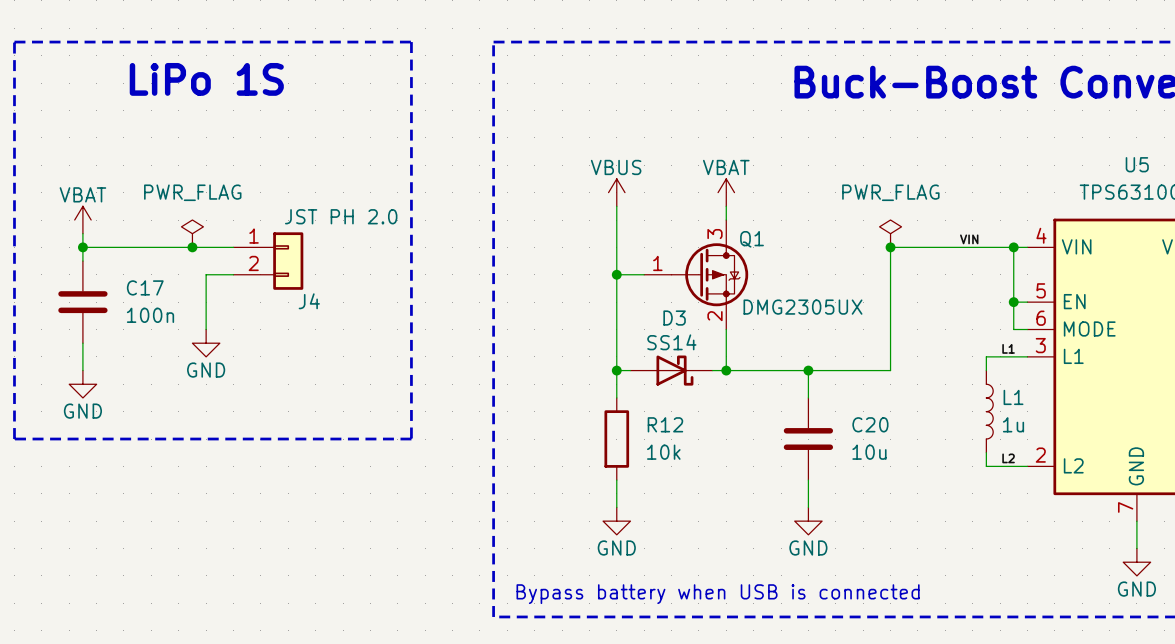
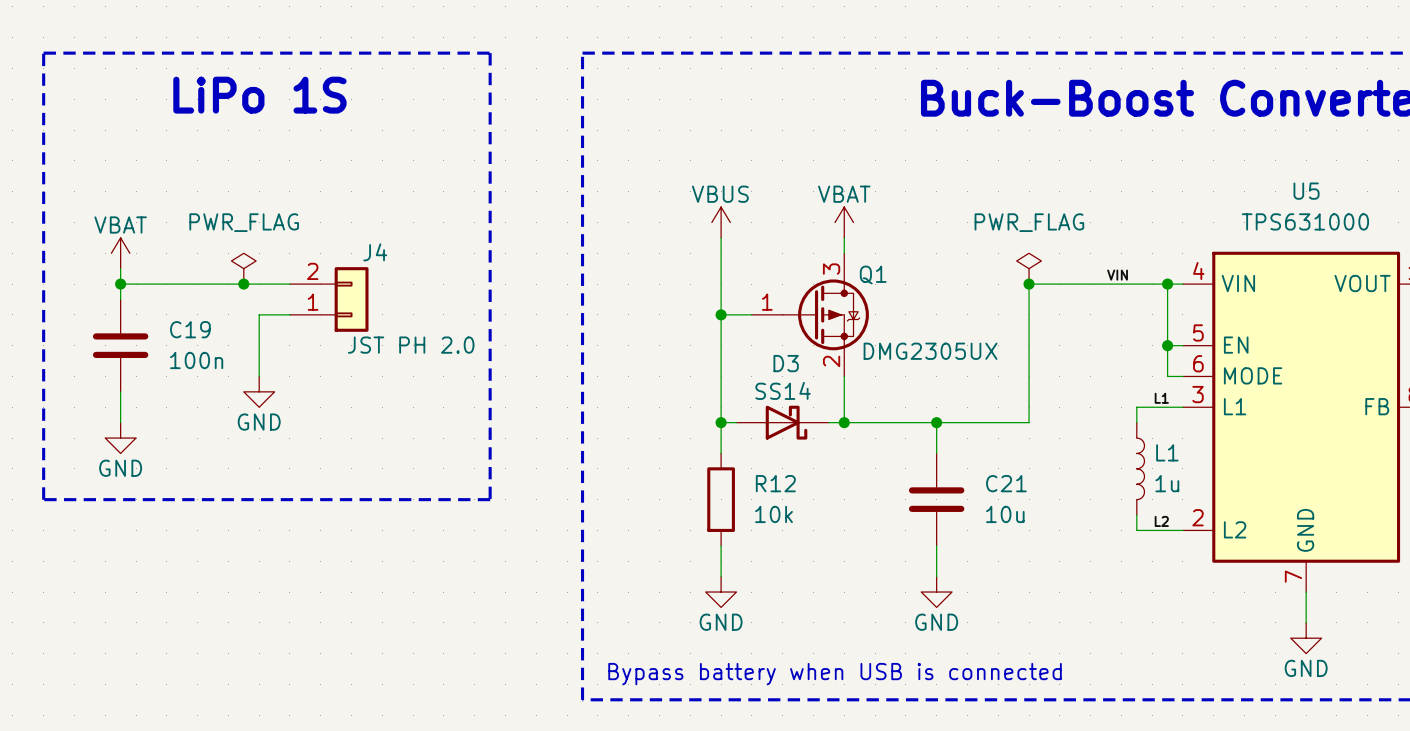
J4 flip: as is (288, 261) -> up-down (351, 299)
C17 name: C17 (145, 287) -> C19 (190, 329)
C20 name: C20 (870, 424) -> C21 (1006, 483)

